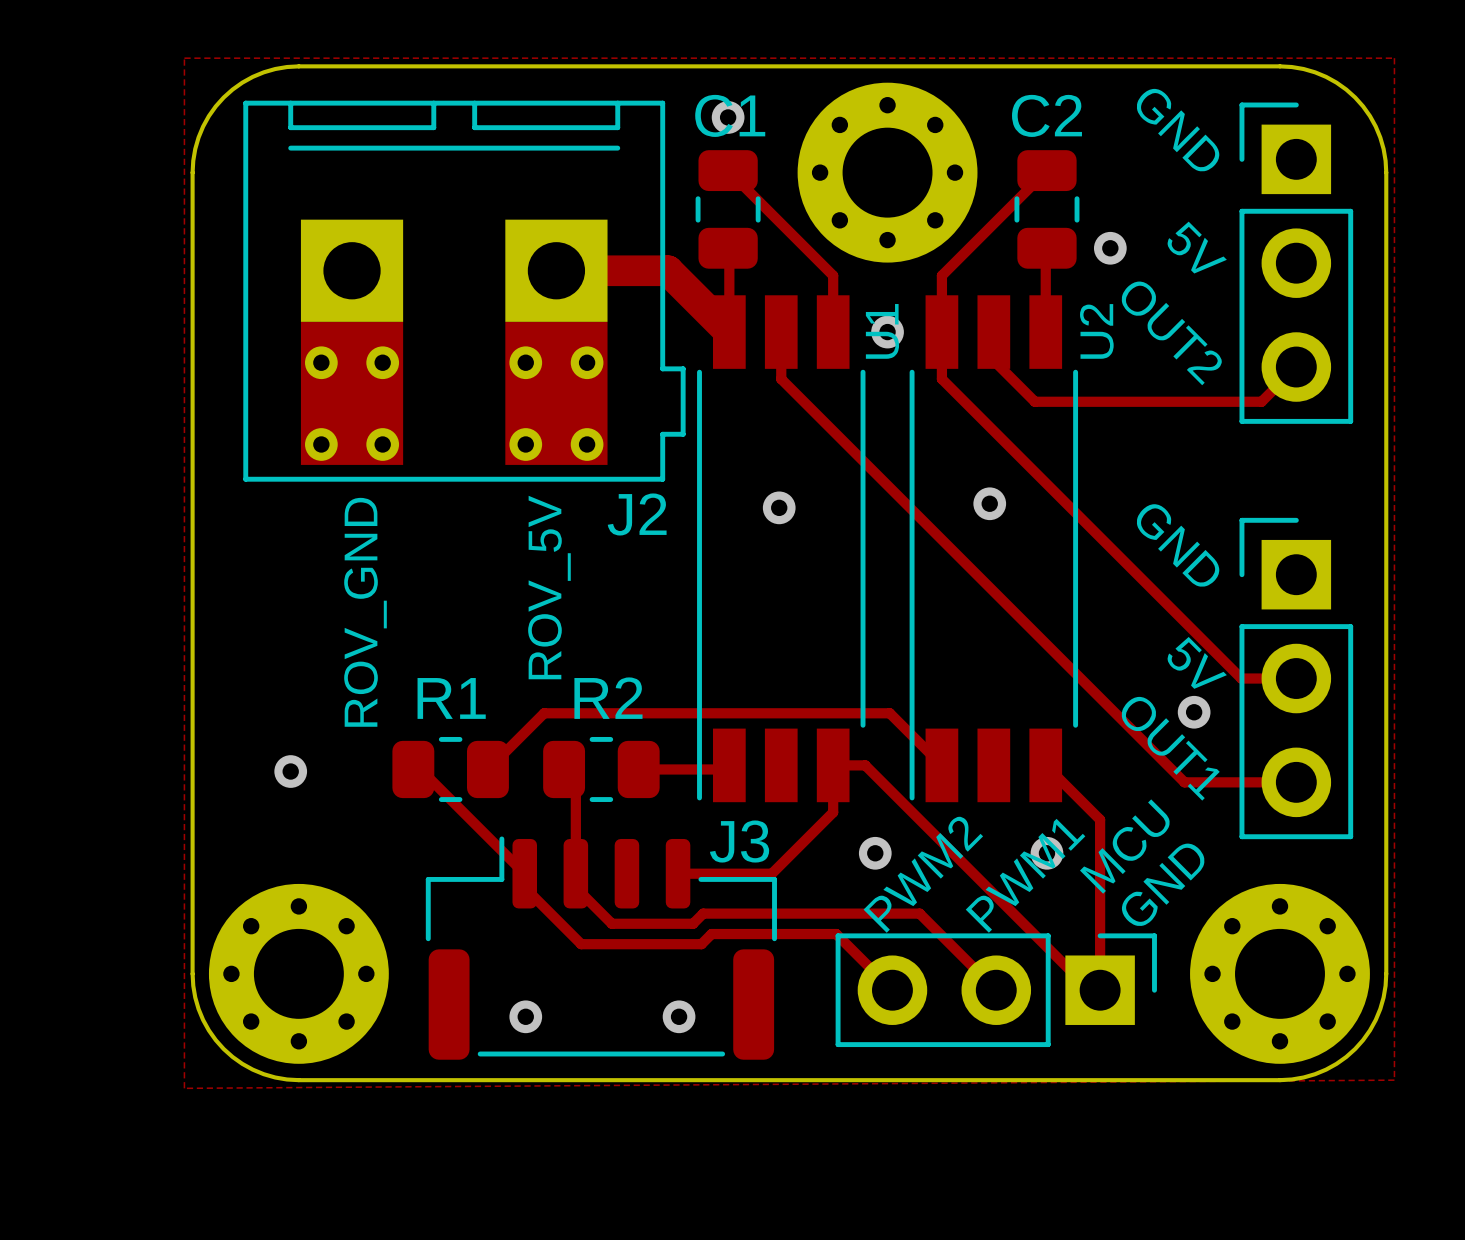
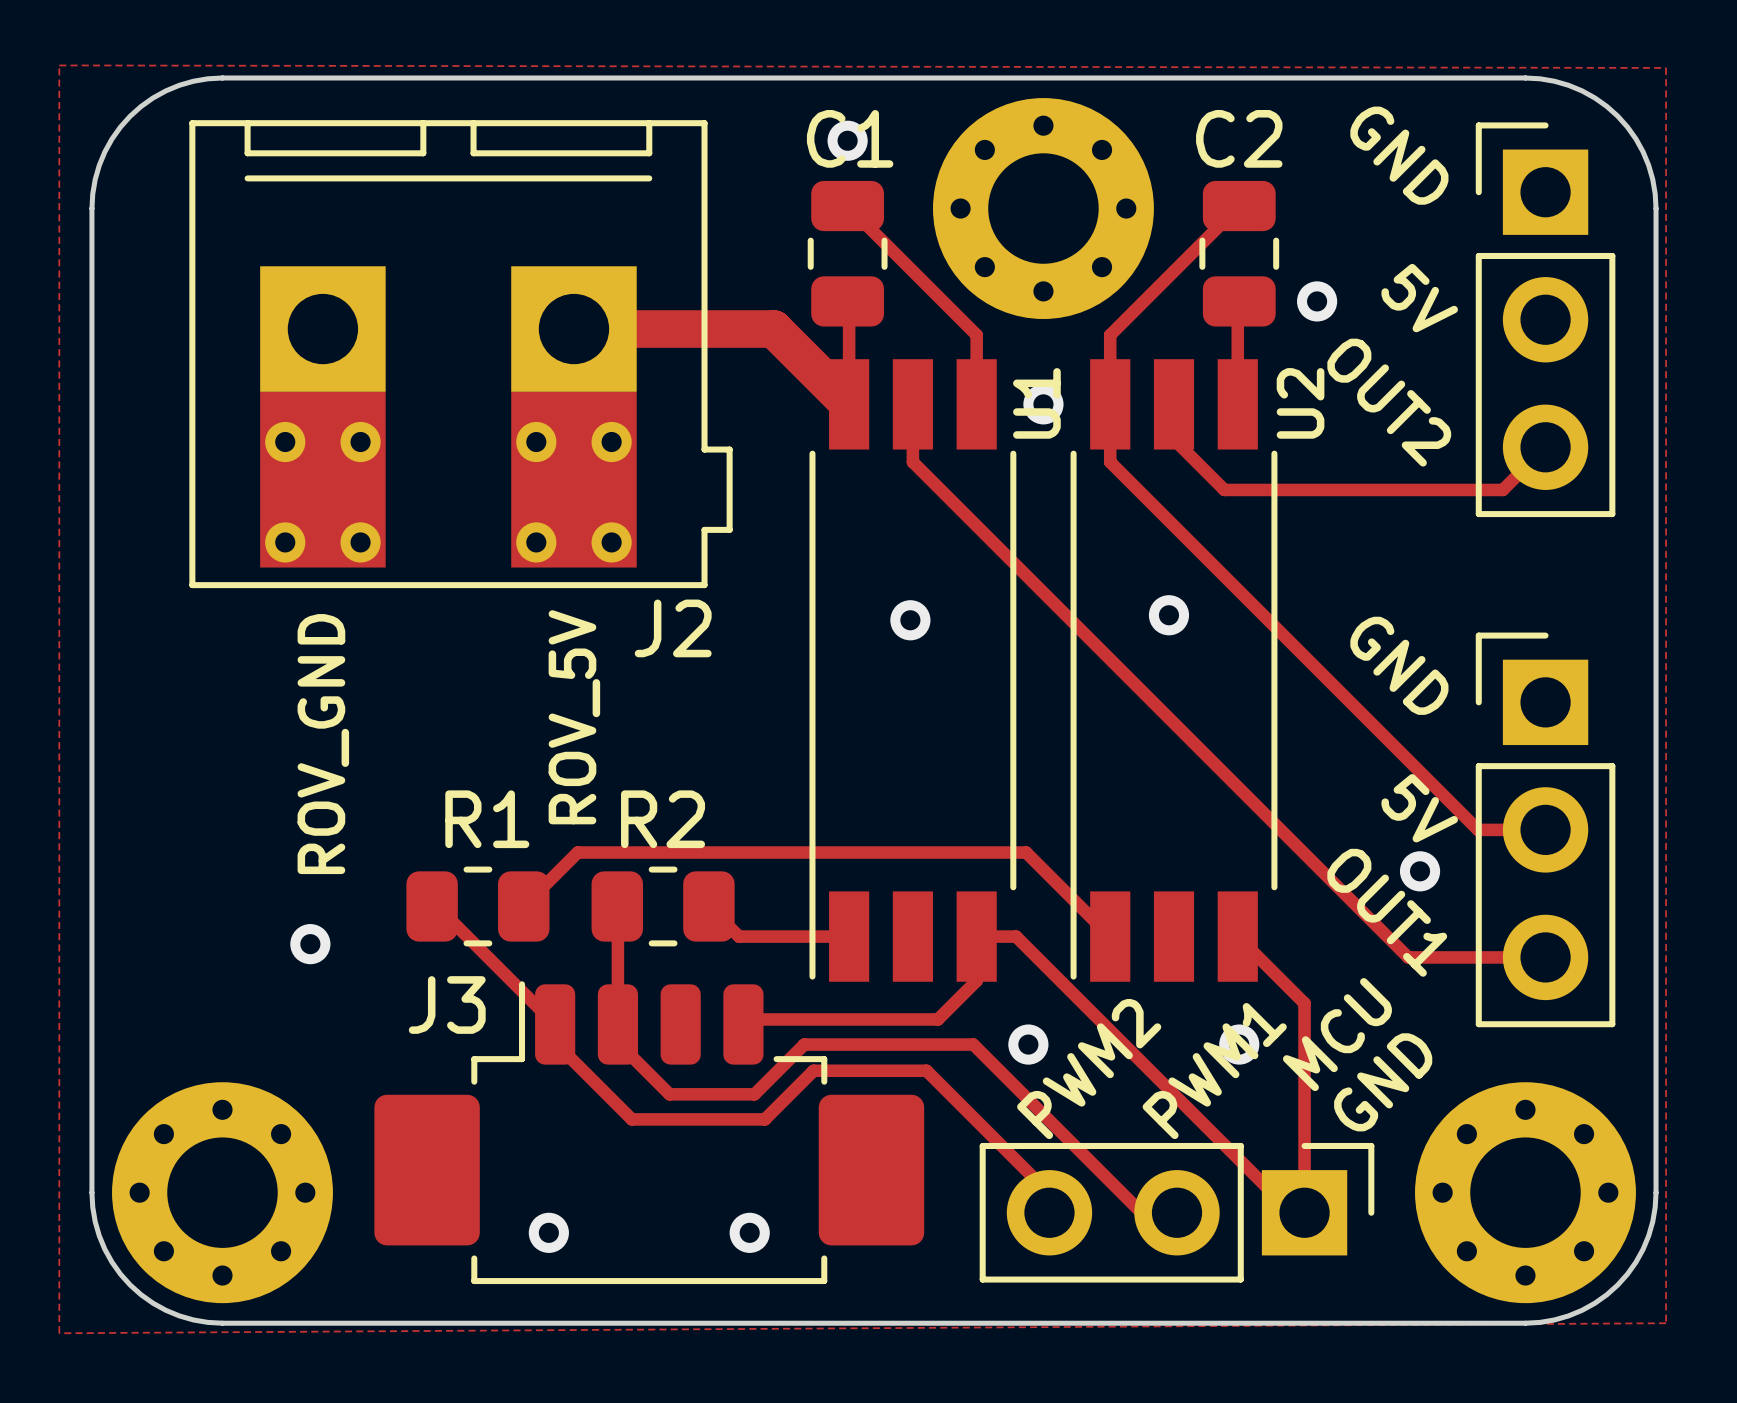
zone outline: (1394, 58) (184, 58) (184, 1088) (1394, 1080) -> (1666, 67) (59, 65) (59, 1333) (1666, 1323)
board edge: (298, 66) (275, 69) (252, 76) (223, 97) (208, 116) (198, 137) (192, 172) (193, 985) (198, 1008) (208, 1030) (232, 1056) (263, 1074) (298, 1080) -> (320, 77) (207, 78) (179, 85) (153, 97) (130, 116) (120, 127) (104, 151) (95, 179) (91, 208) (91, 1192) (95, 1221) (104, 1249) (120, 1274) (141, 1294) (165, 1310) (193, 1319) (207, 1322) (320, 1323)
J2 position: (464, 291) -> (460, 354)
text position: ROV_5V (549, 587) -> ROV_5V (574, 717)
text position: ROV_GND (365, 612) -> ROV_GND (323, 744)
R1 name position: R1 (451, 698) -> R1 (487, 819)
R2 name position: R2 (608, 698) -> R2 (663, 819)
track: (889, 713) (544, 713) (487, 769) -> (1046, 872) (1026, 852) (577, 852) (523, 906)
track: (729, 765) (725, 769) (638, 769) -> (849, 936) (739, 936) (708, 906)
track: (413, 769) (420, 769) (524, 873) (524, 887) (581, 944) (701, 944) (711, 934) (836, 934) (892, 990) -> (432, 906) (437, 906) (555, 1024) (555, 1042) (631, 1119) (764, 1119) (813, 1070) (926, 1070) (1049, 1193) (1049, 1212)
R1 position: (450, 769) -> (477, 906)
track: (564, 769) (575, 781) (575, 887) (611, 923) (693, 923) (703, 913) (919, 913) (996, 990) -> (617, 907) (617, 1042) (669, 1094) (754, 1094) (804, 1044) (973, 1044) (1141, 1212) (1177, 1212)
R2 position: (601, 769) -> (663, 906)
track: (833, 801) (833, 812) (771, 873) (678, 873) -> (976, 980) (937, 1019) (748, 1019) (743, 1024)
J3 footprint: [425, 836, 777, 1060] -> [374, 981, 925, 1285]
J3 name position: J3 (739, 841) -> J3 (447, 1005)
part position: (298, 973) -> (222, 1192)
via position: (525, 1016) -> (548, 1232)
via position: (679, 1016) -> (749, 1232)

